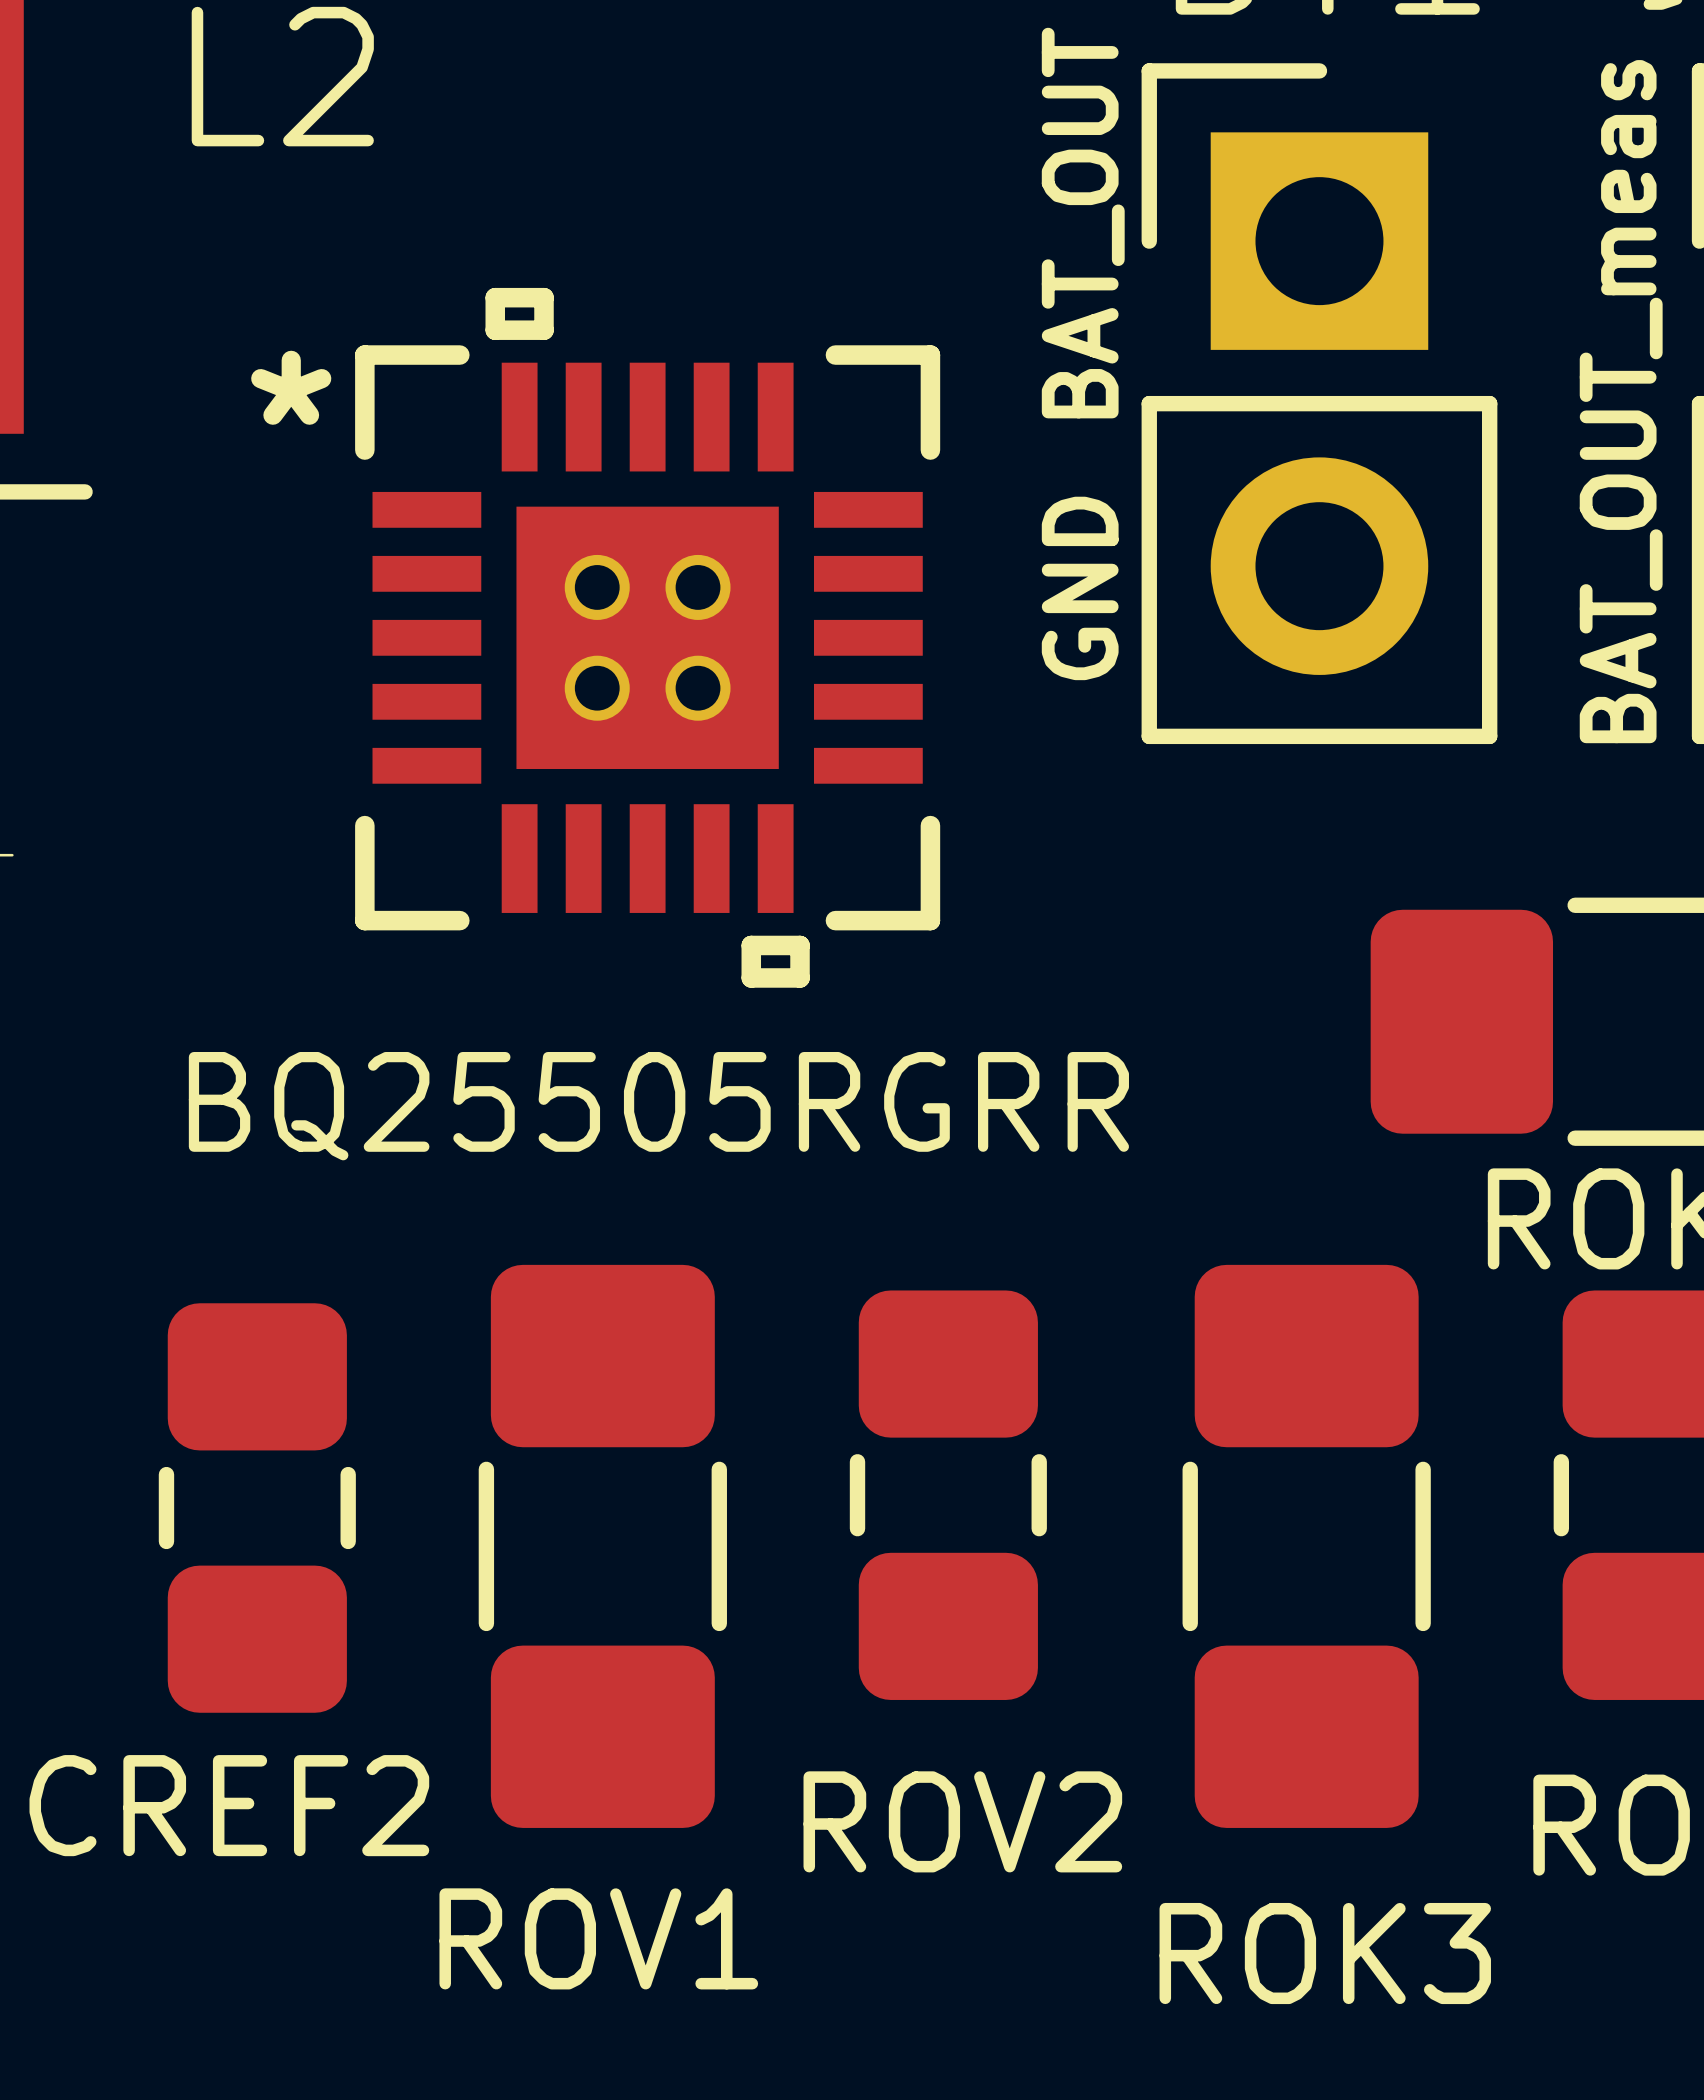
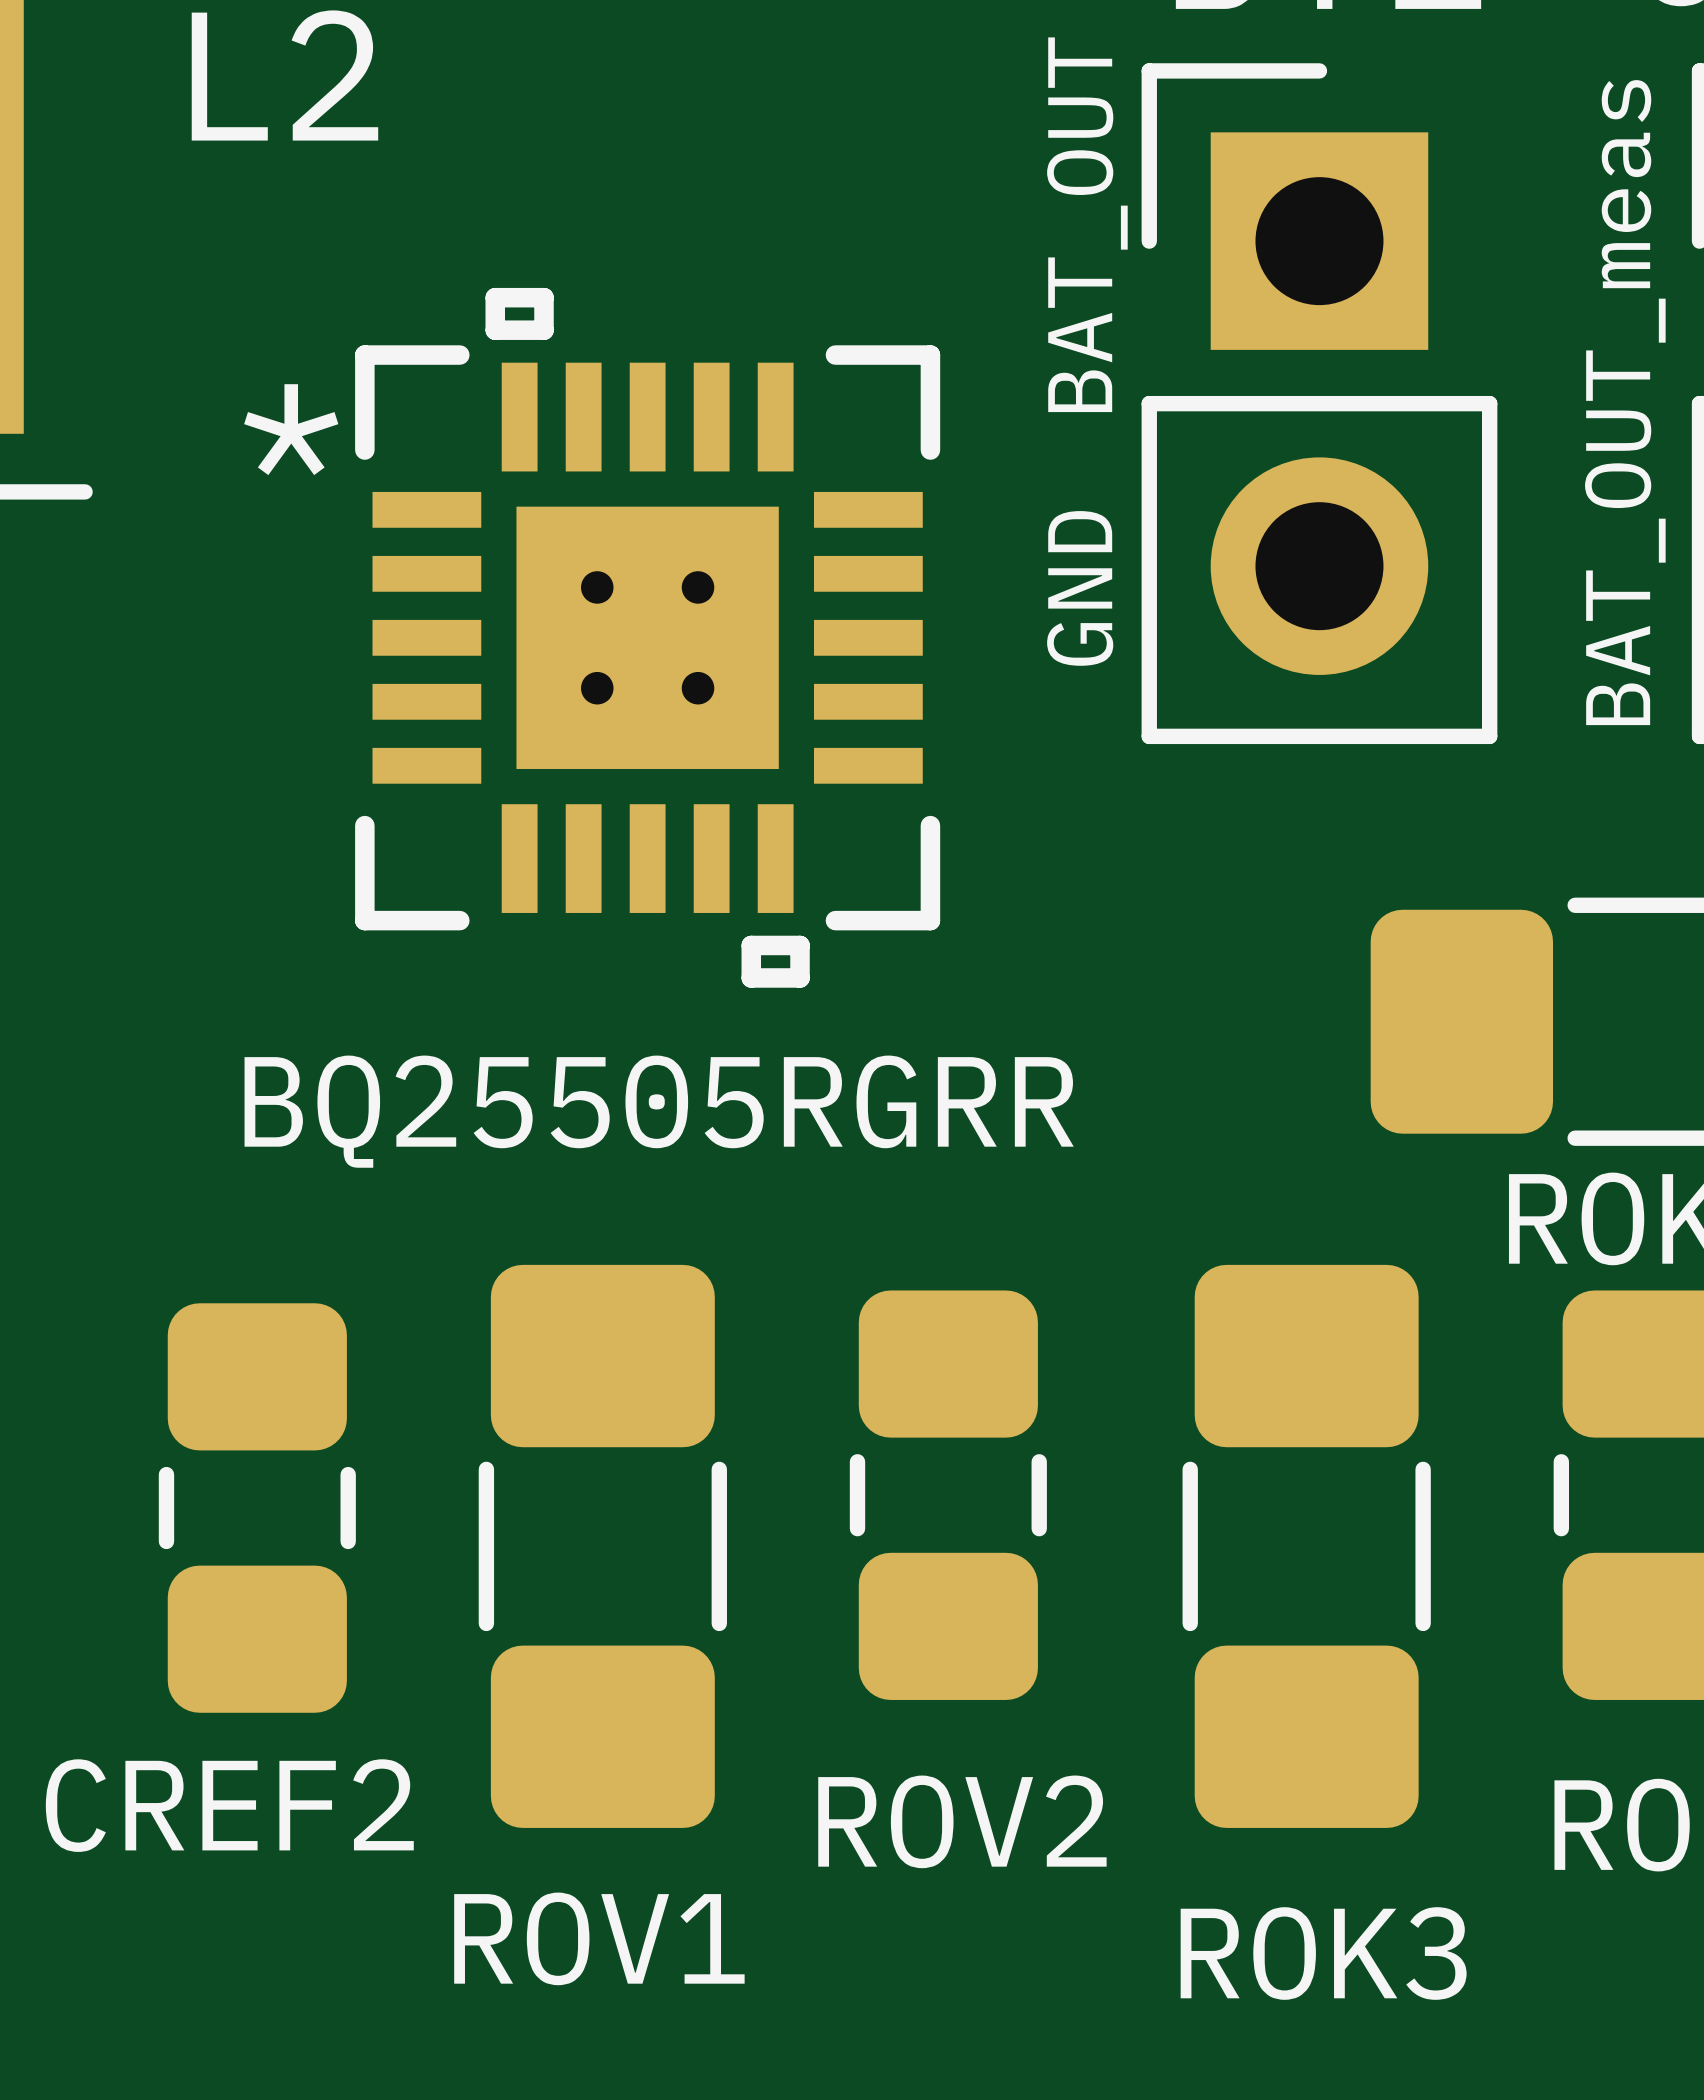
part footprint: [355, 287, 941, 988] -> [355, 287, 941, 988]

